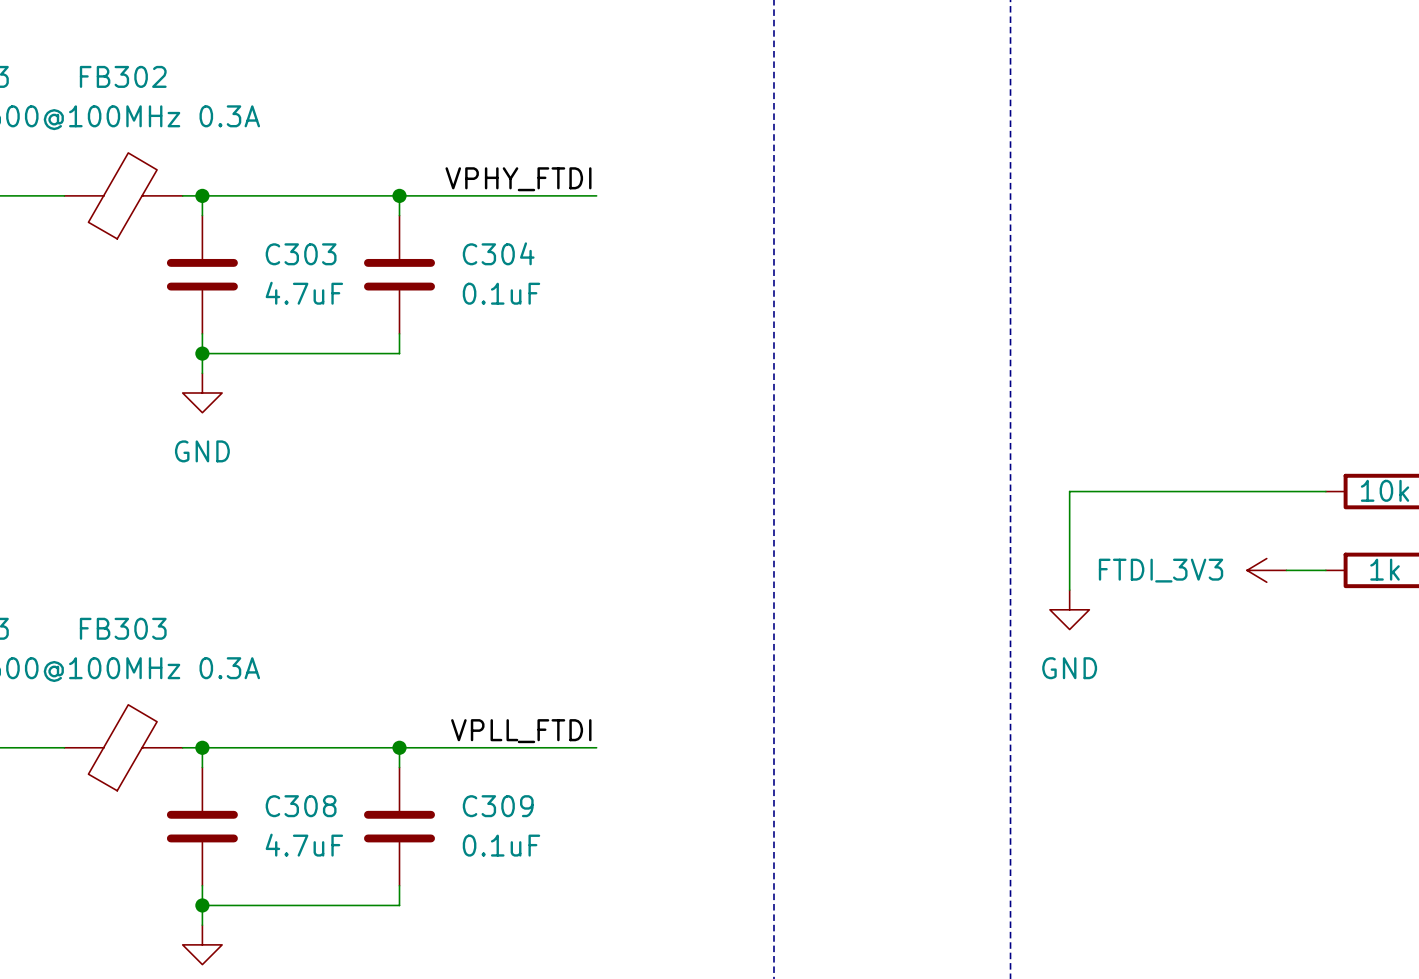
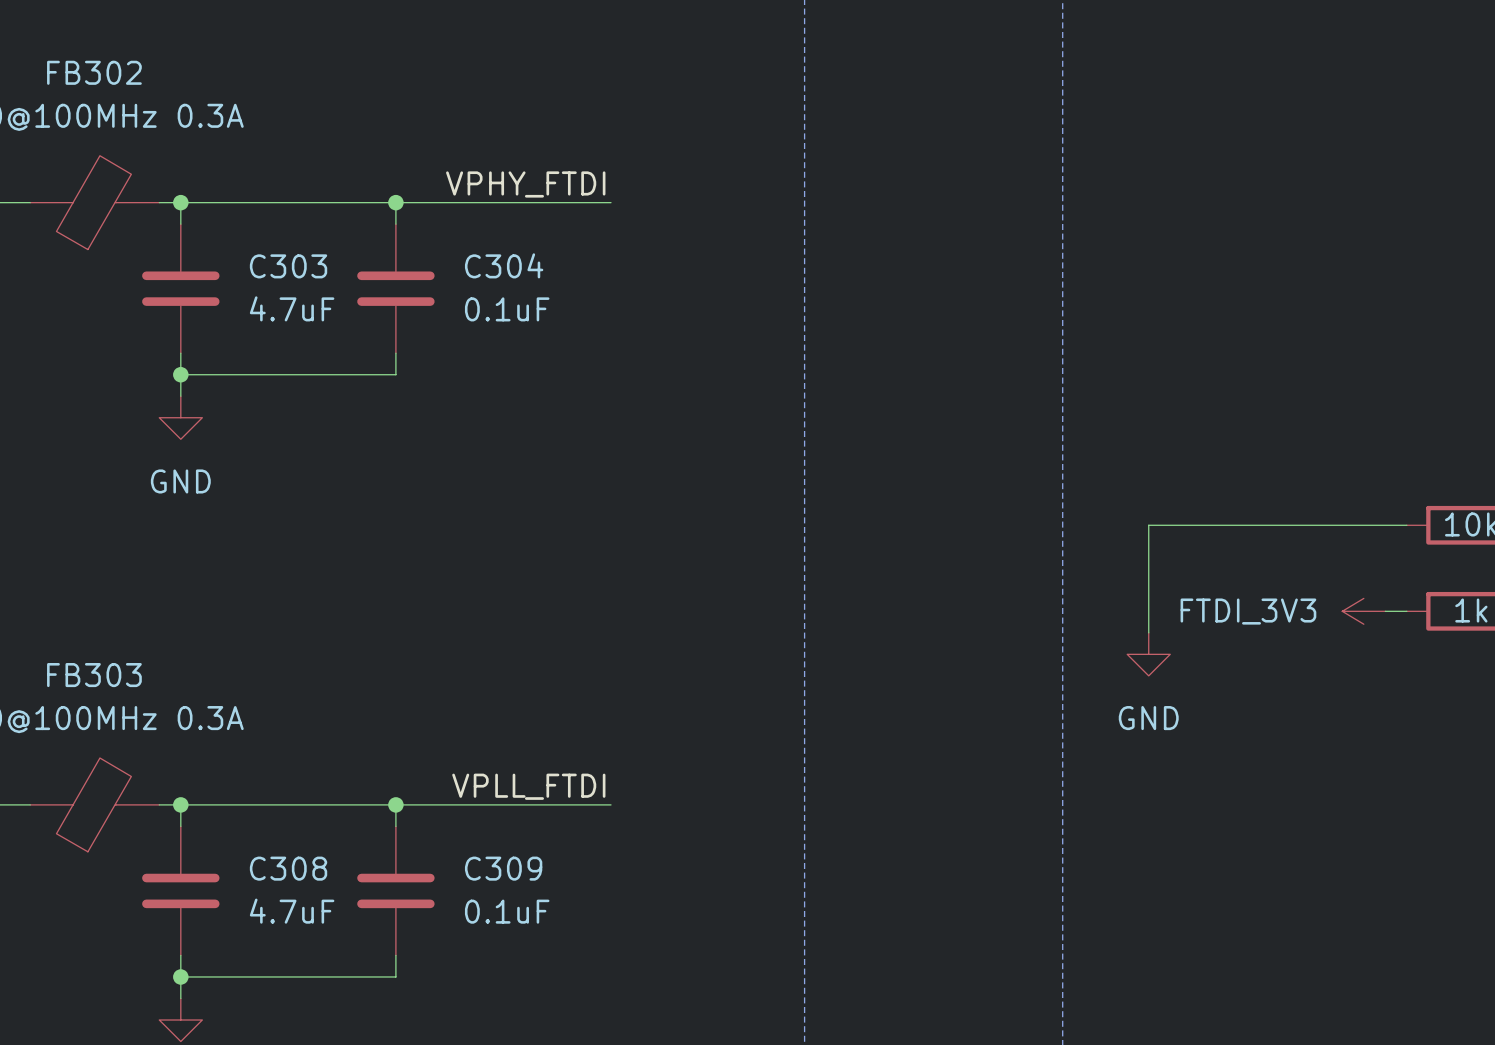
wire: (1089, 491) (1069, 491) (1069, 590) -> (1148, 525) (1148, 632)
power symbol position: FTDI_3V3 (1266, 570) -> FTDI_3V3 (1363, 611)
power symbol position: GND (1069, 609) -> GND (1148, 654)

